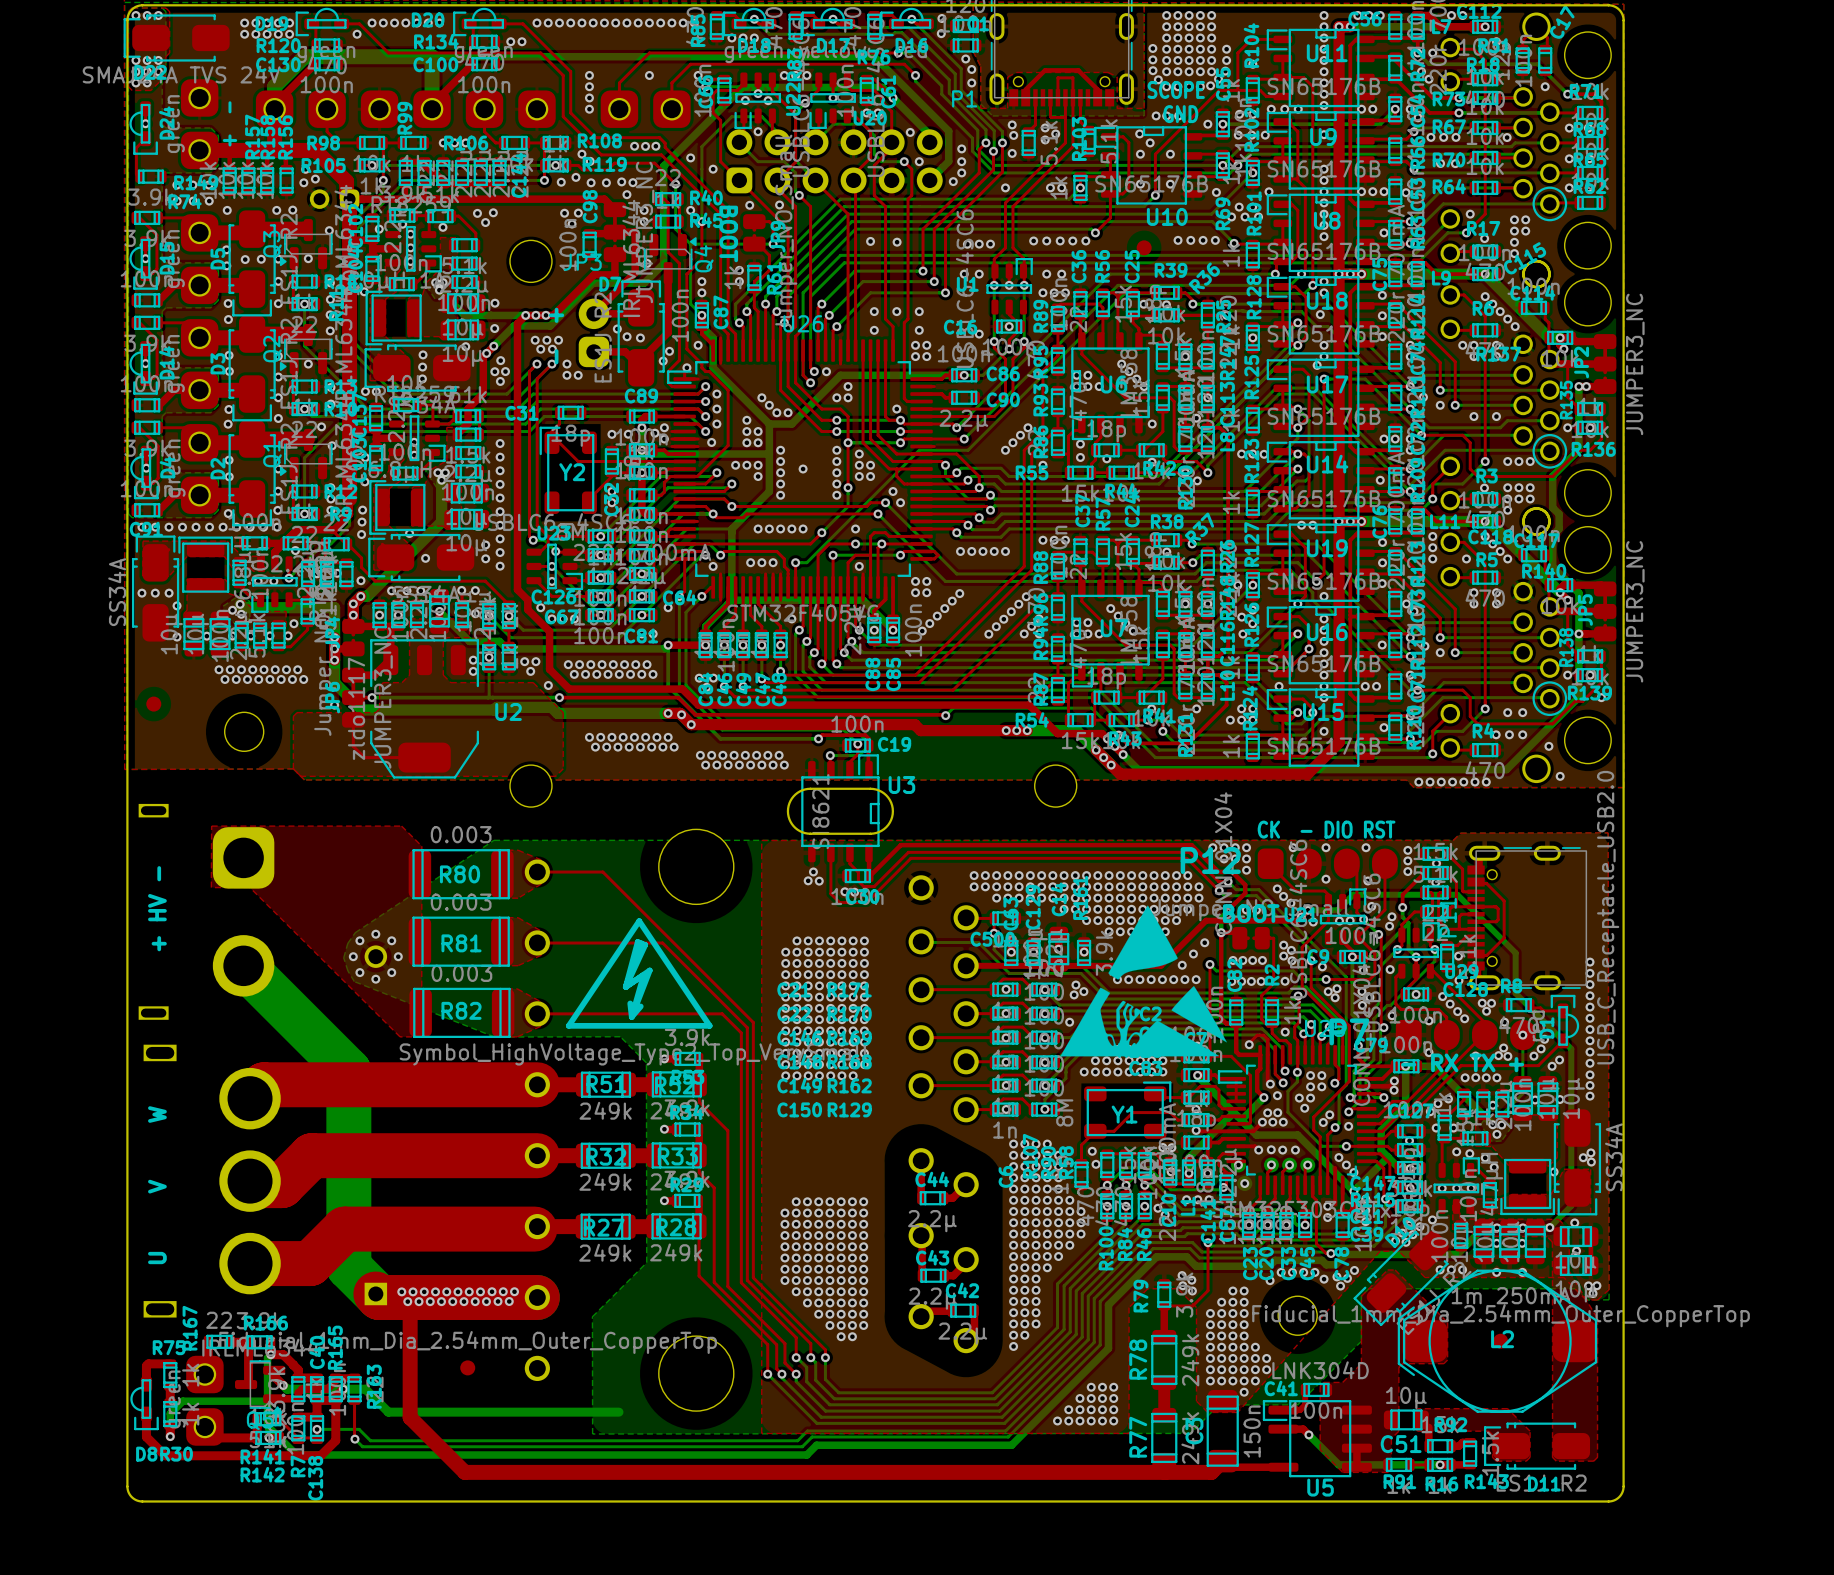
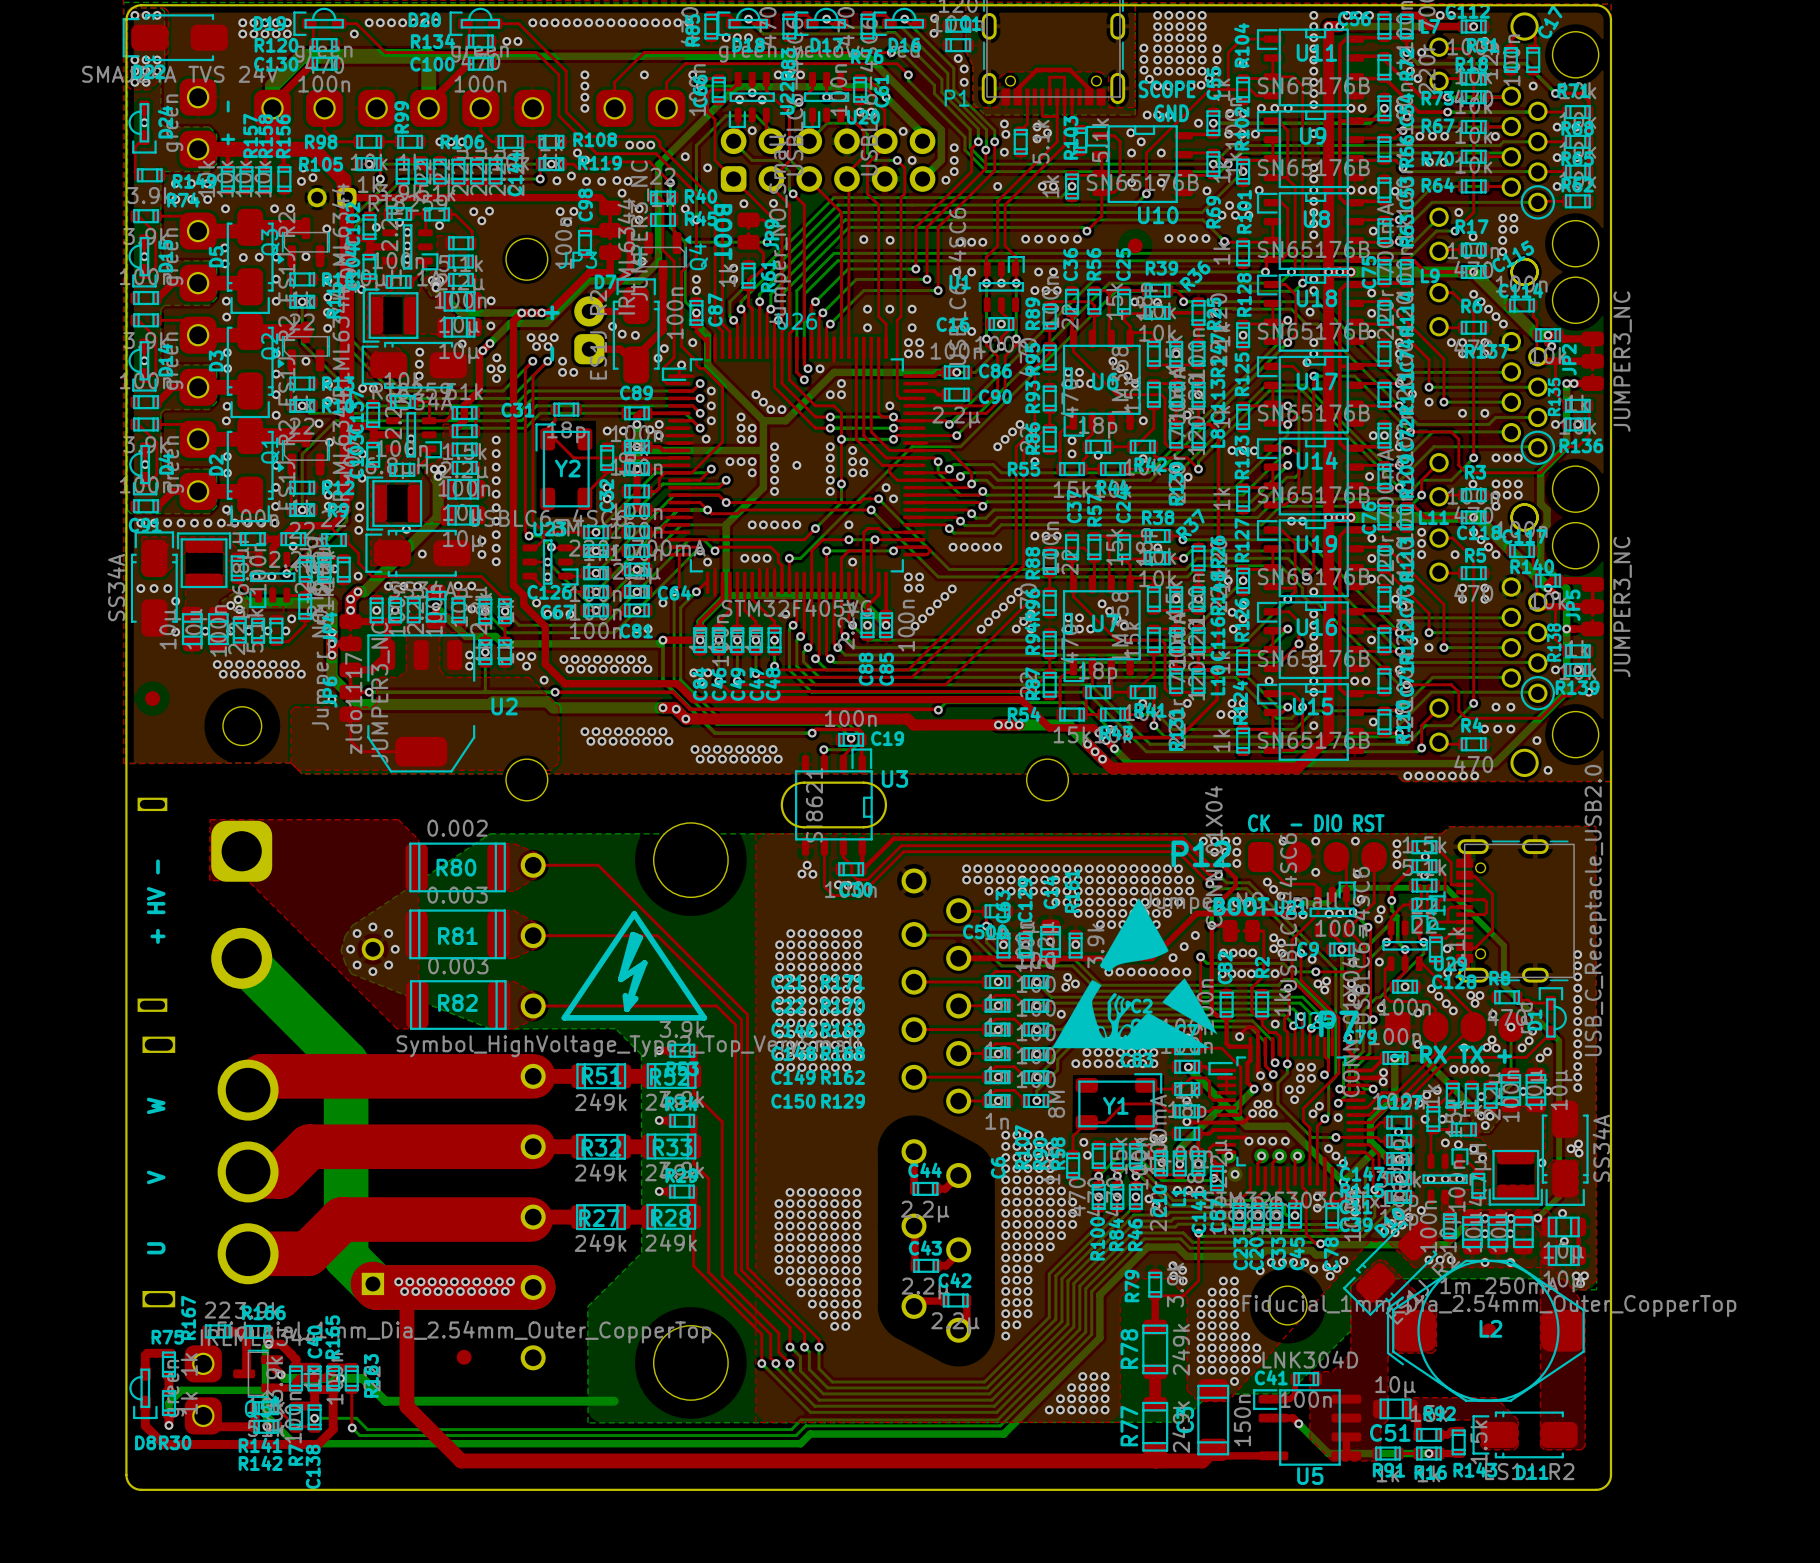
R80 value: 0.003 (461, 834) -> 0.002 (457, 828)

